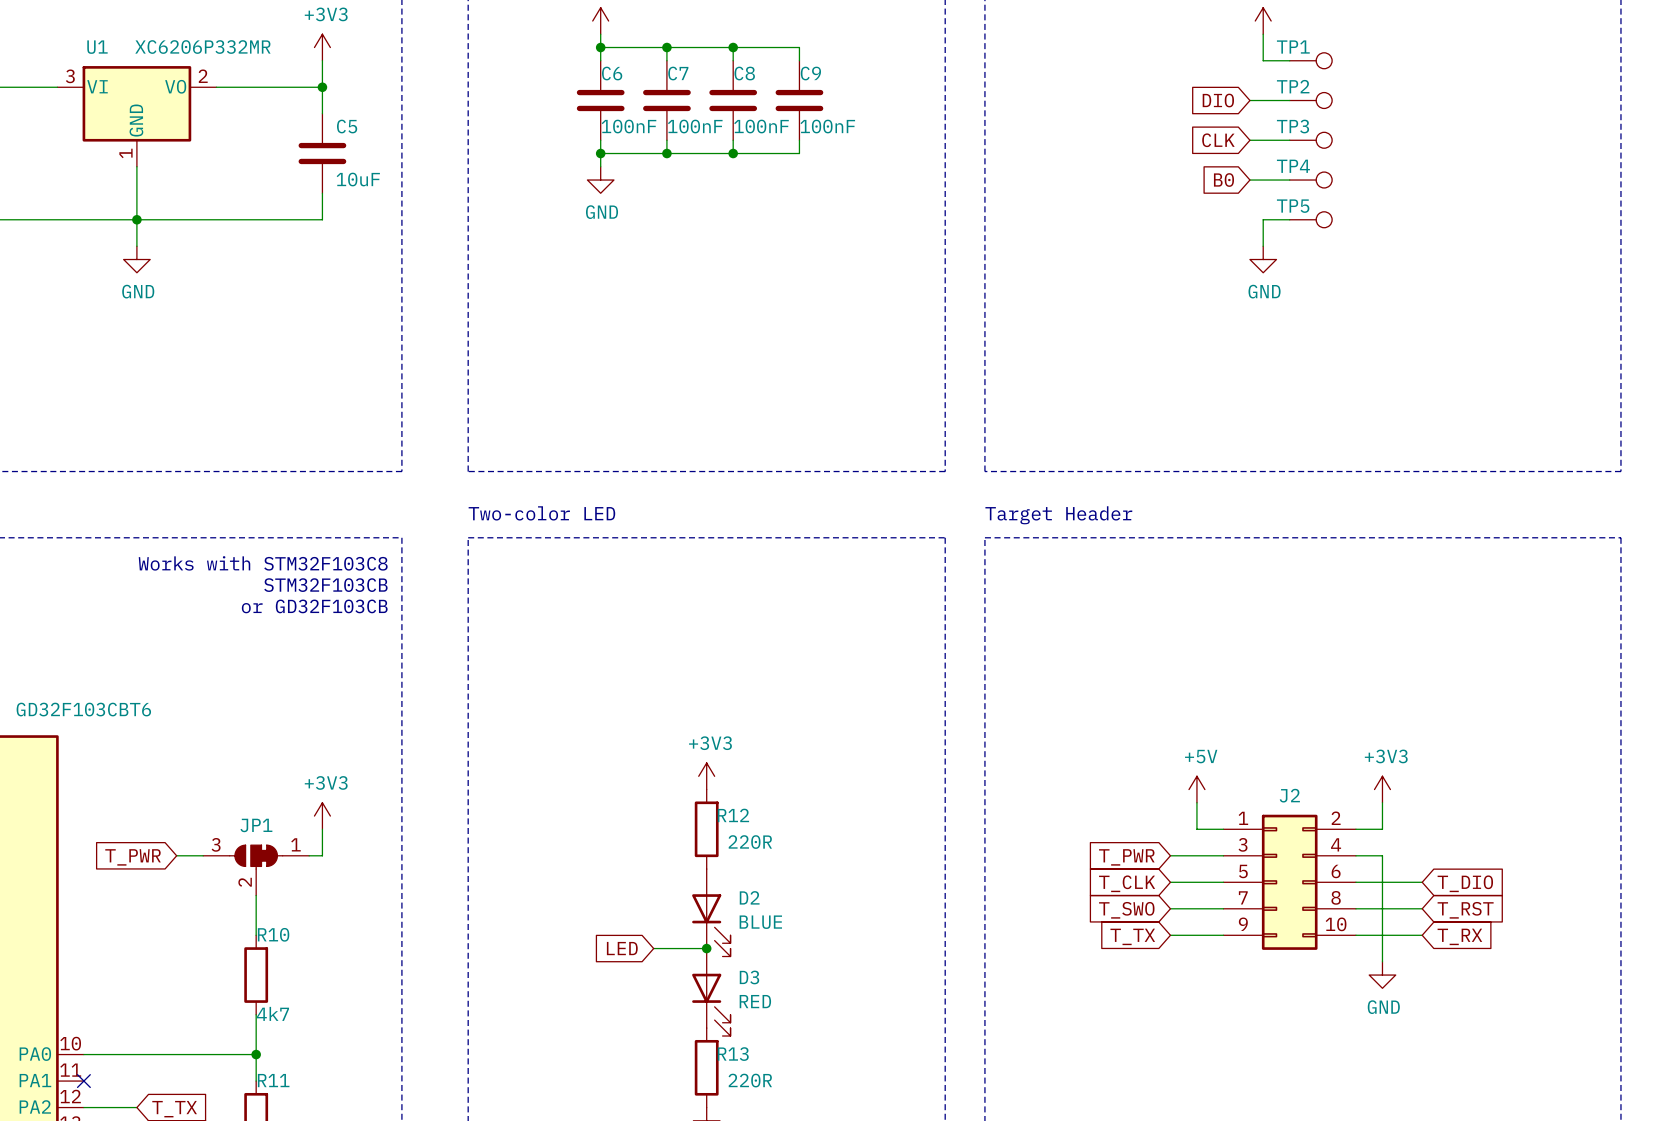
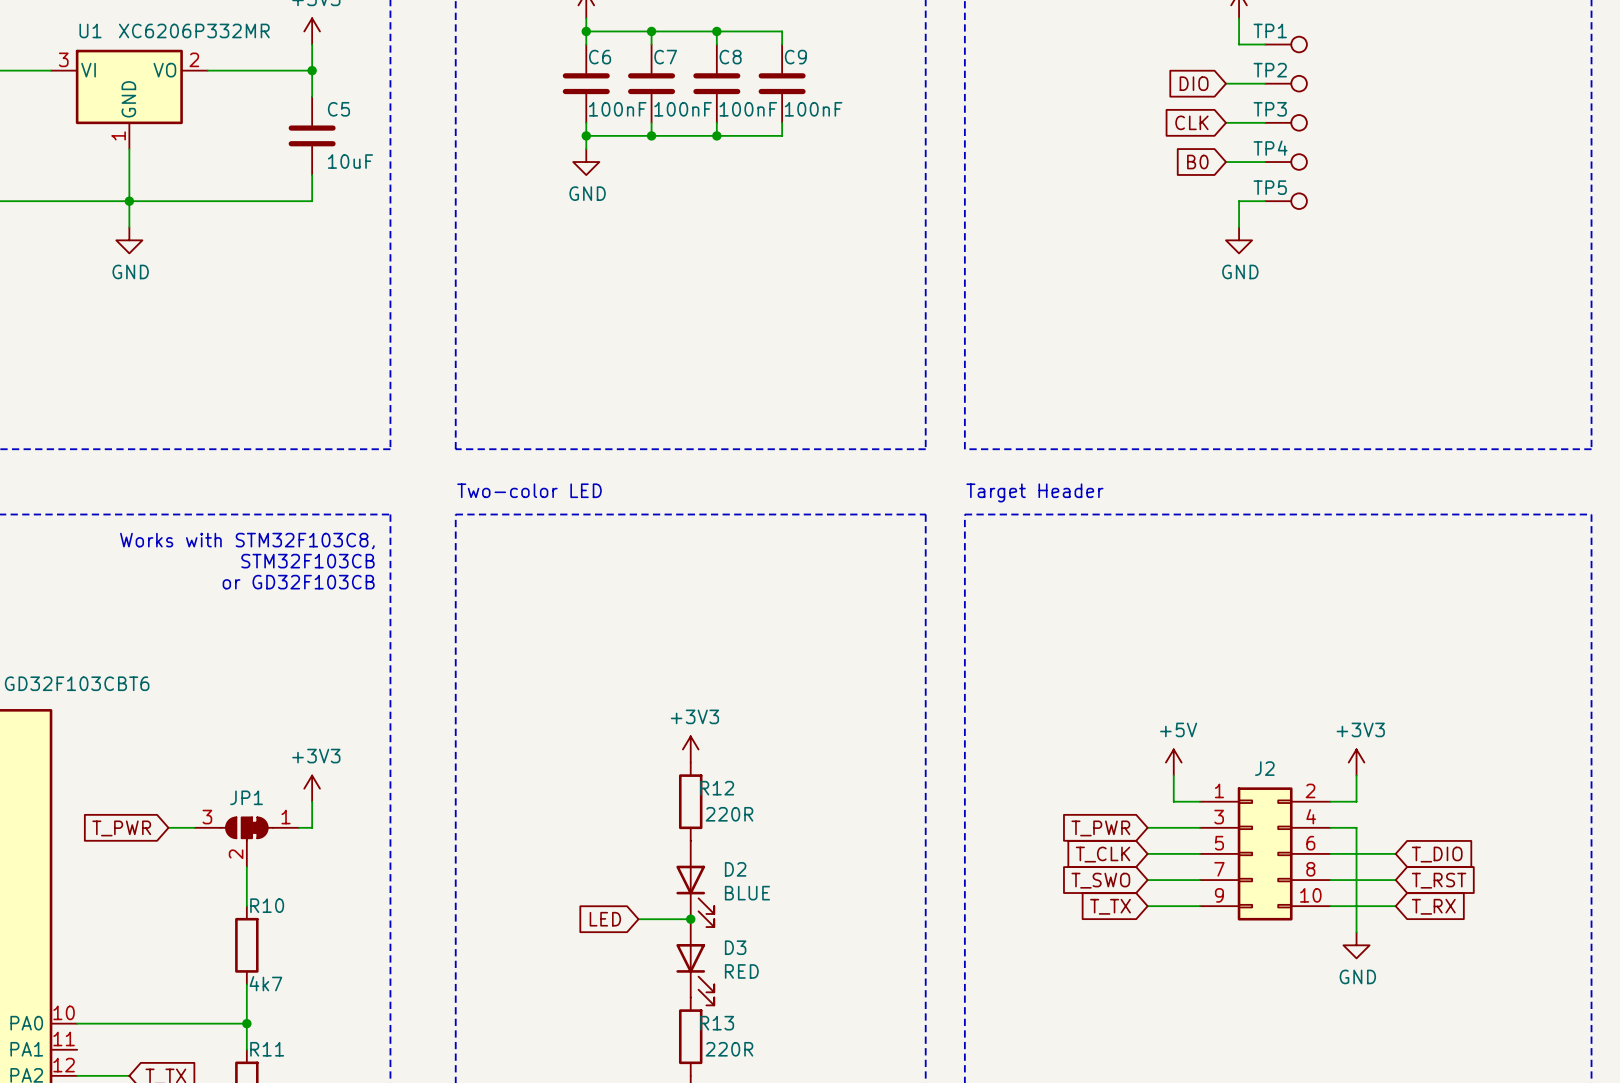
text: Works with STM32F103C8 (263, 563) -> Works with STM32F103C8, (247, 541)
no-connect mark: (83, 1081) -> none

